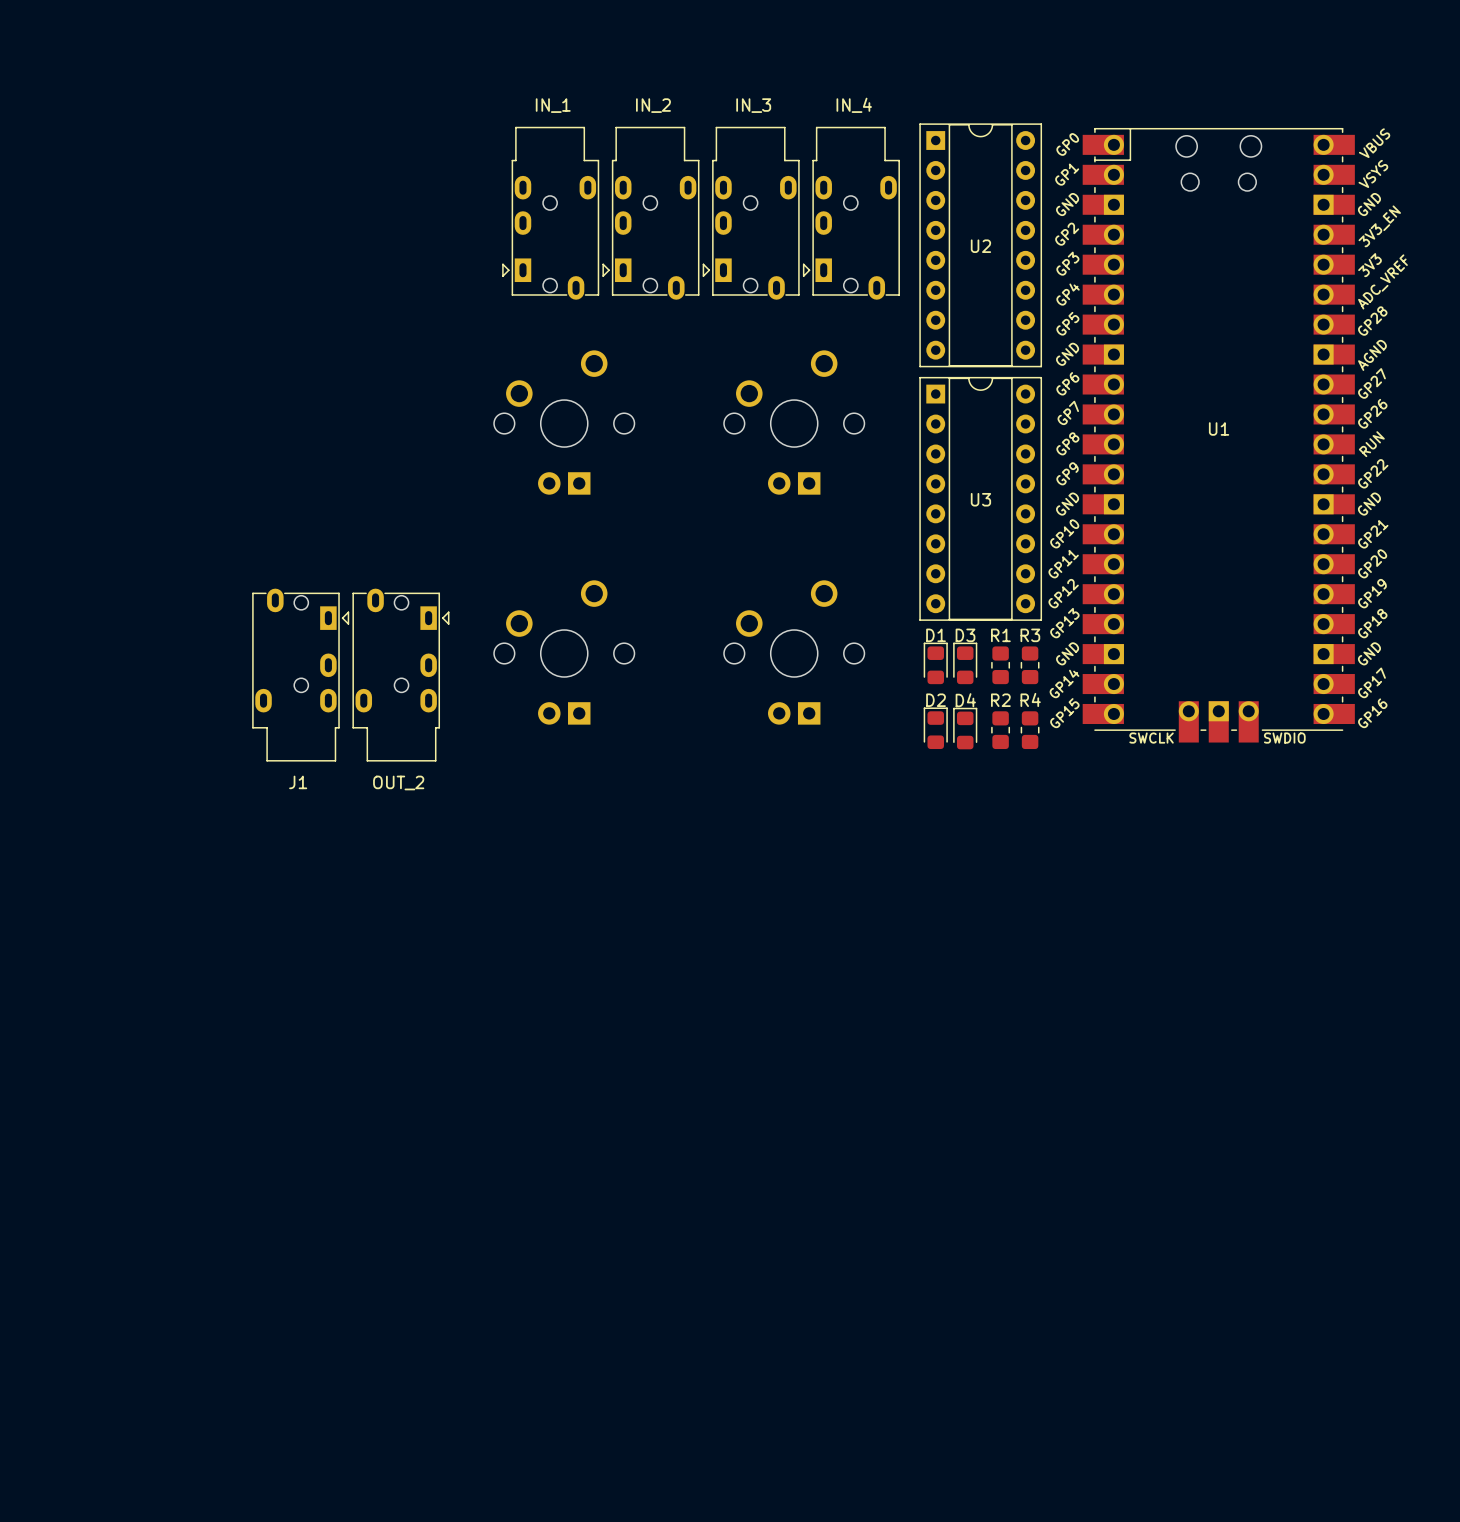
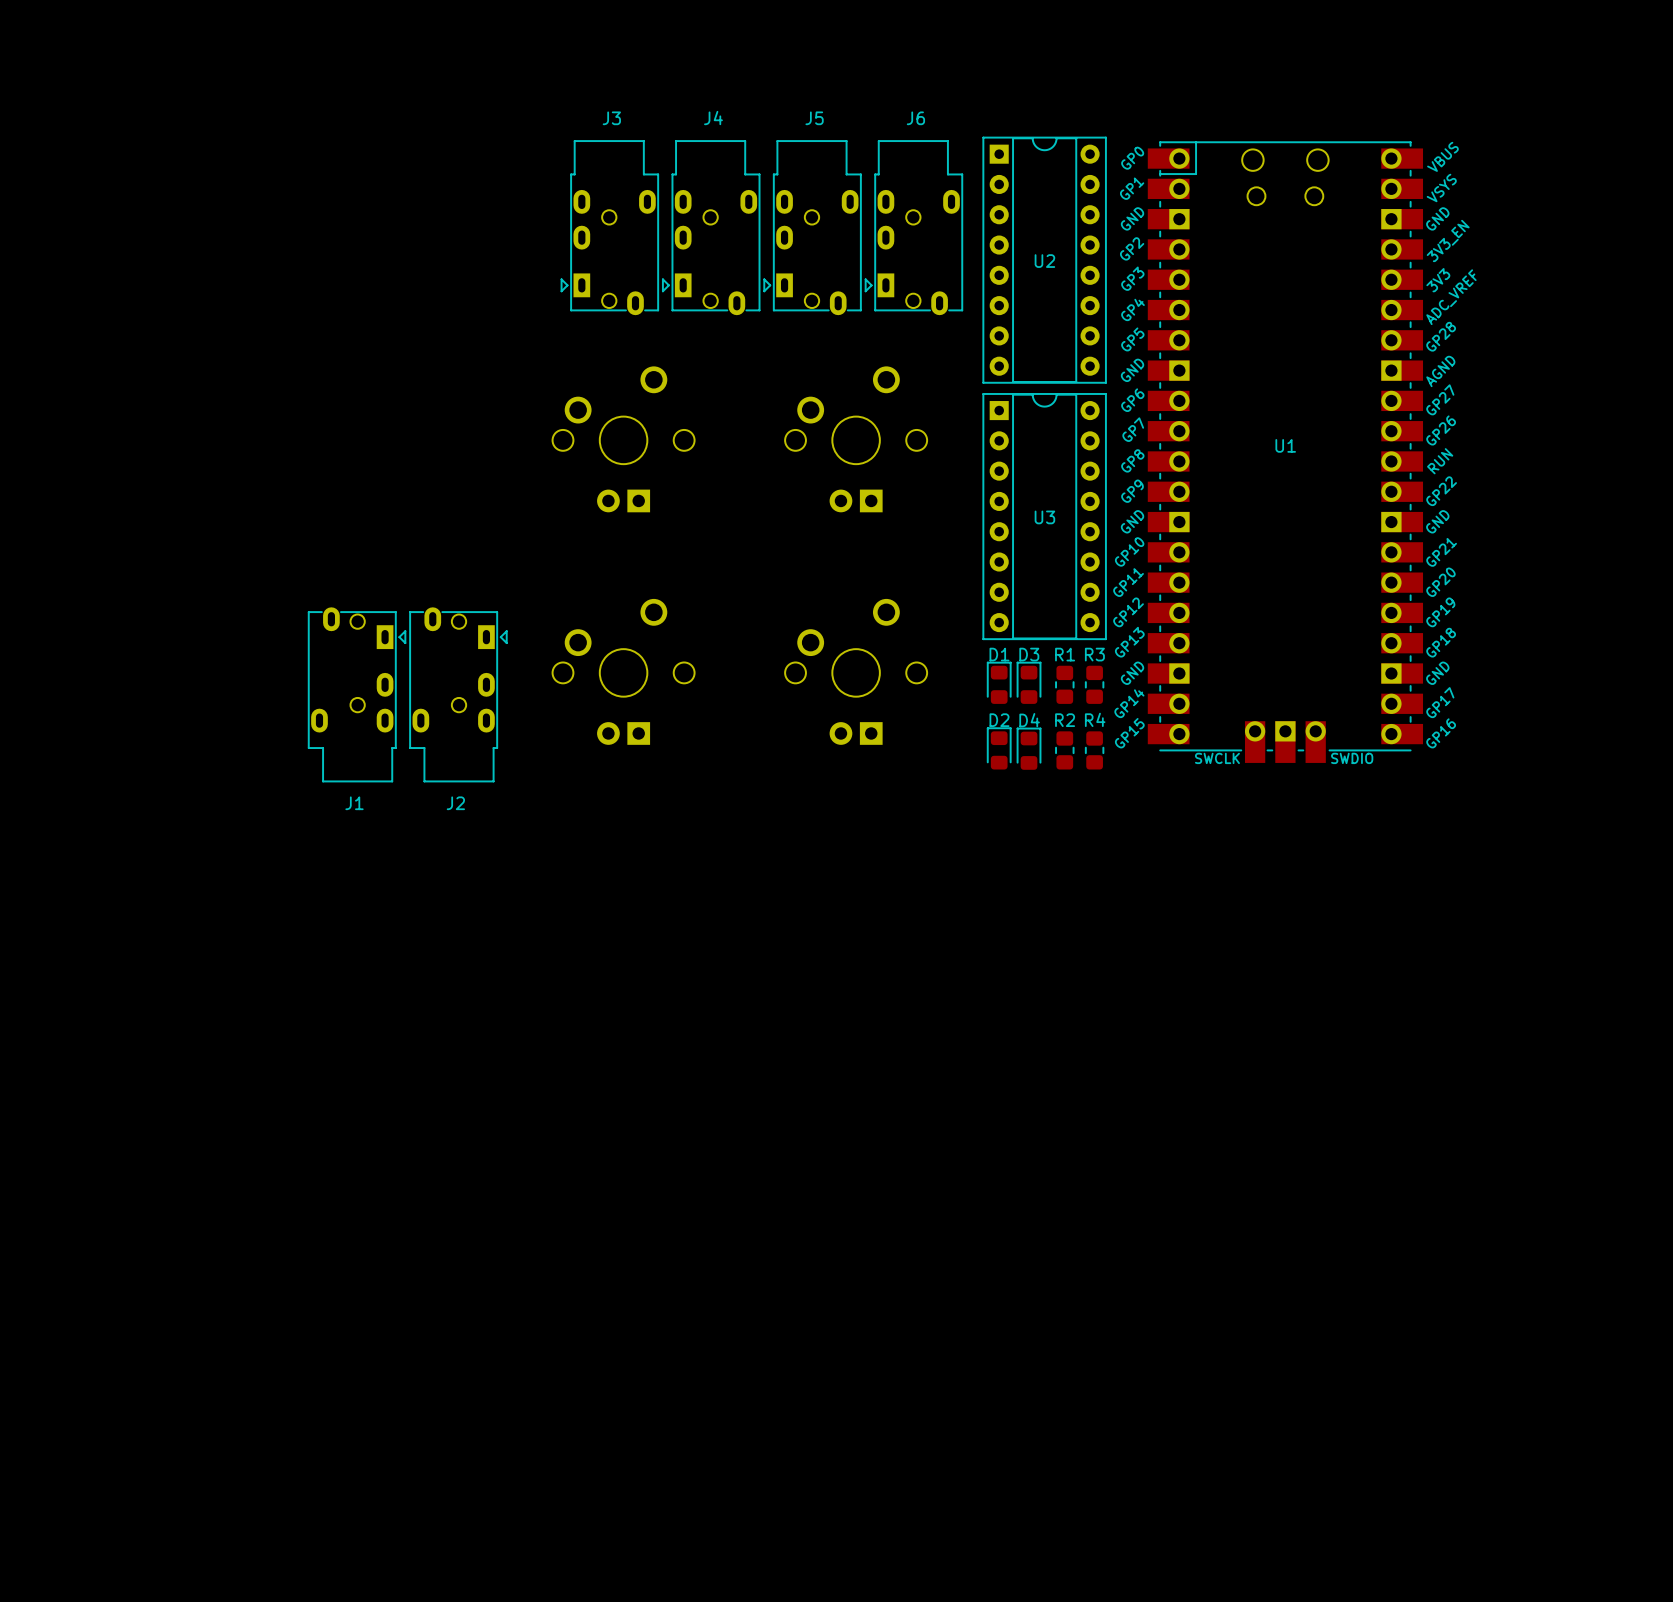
IN_1 name: IN_1 (553, 105) -> J3 (611, 118)
IN_2 name: IN_2 (653, 105) -> J4 (713, 118)
IN_3 name: IN_3 (753, 105) -> J5 (814, 118)
IN_4 name: IN_4 (854, 105) -> J6 (915, 118)
OUT_2 name: OUT_2 (398, 782) -> J2 (455, 803)

